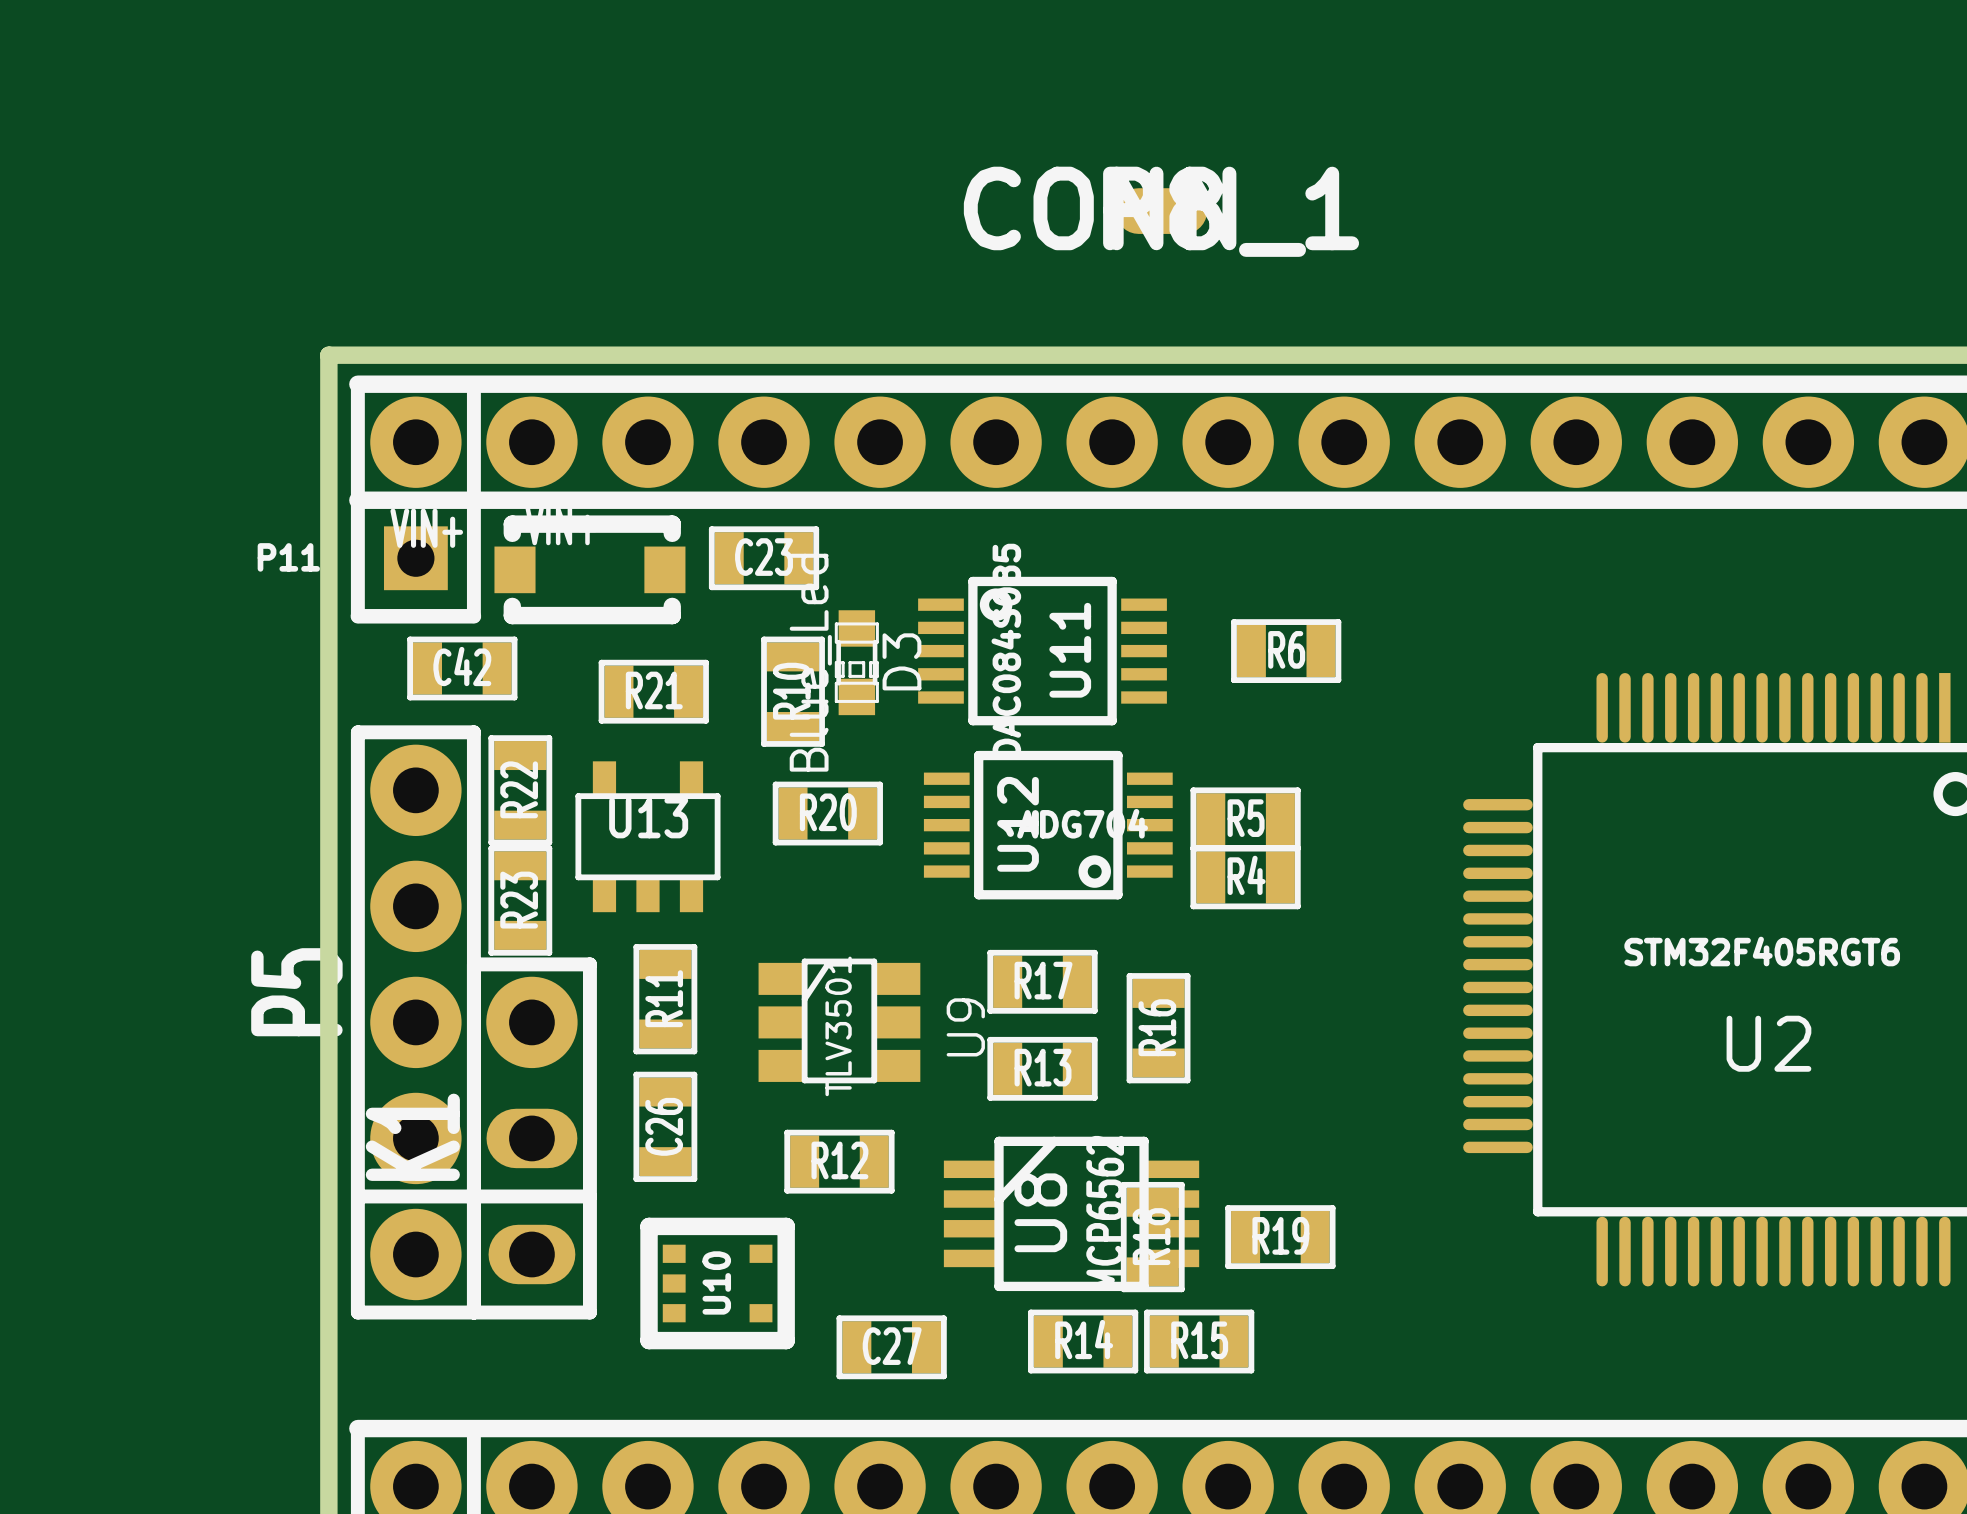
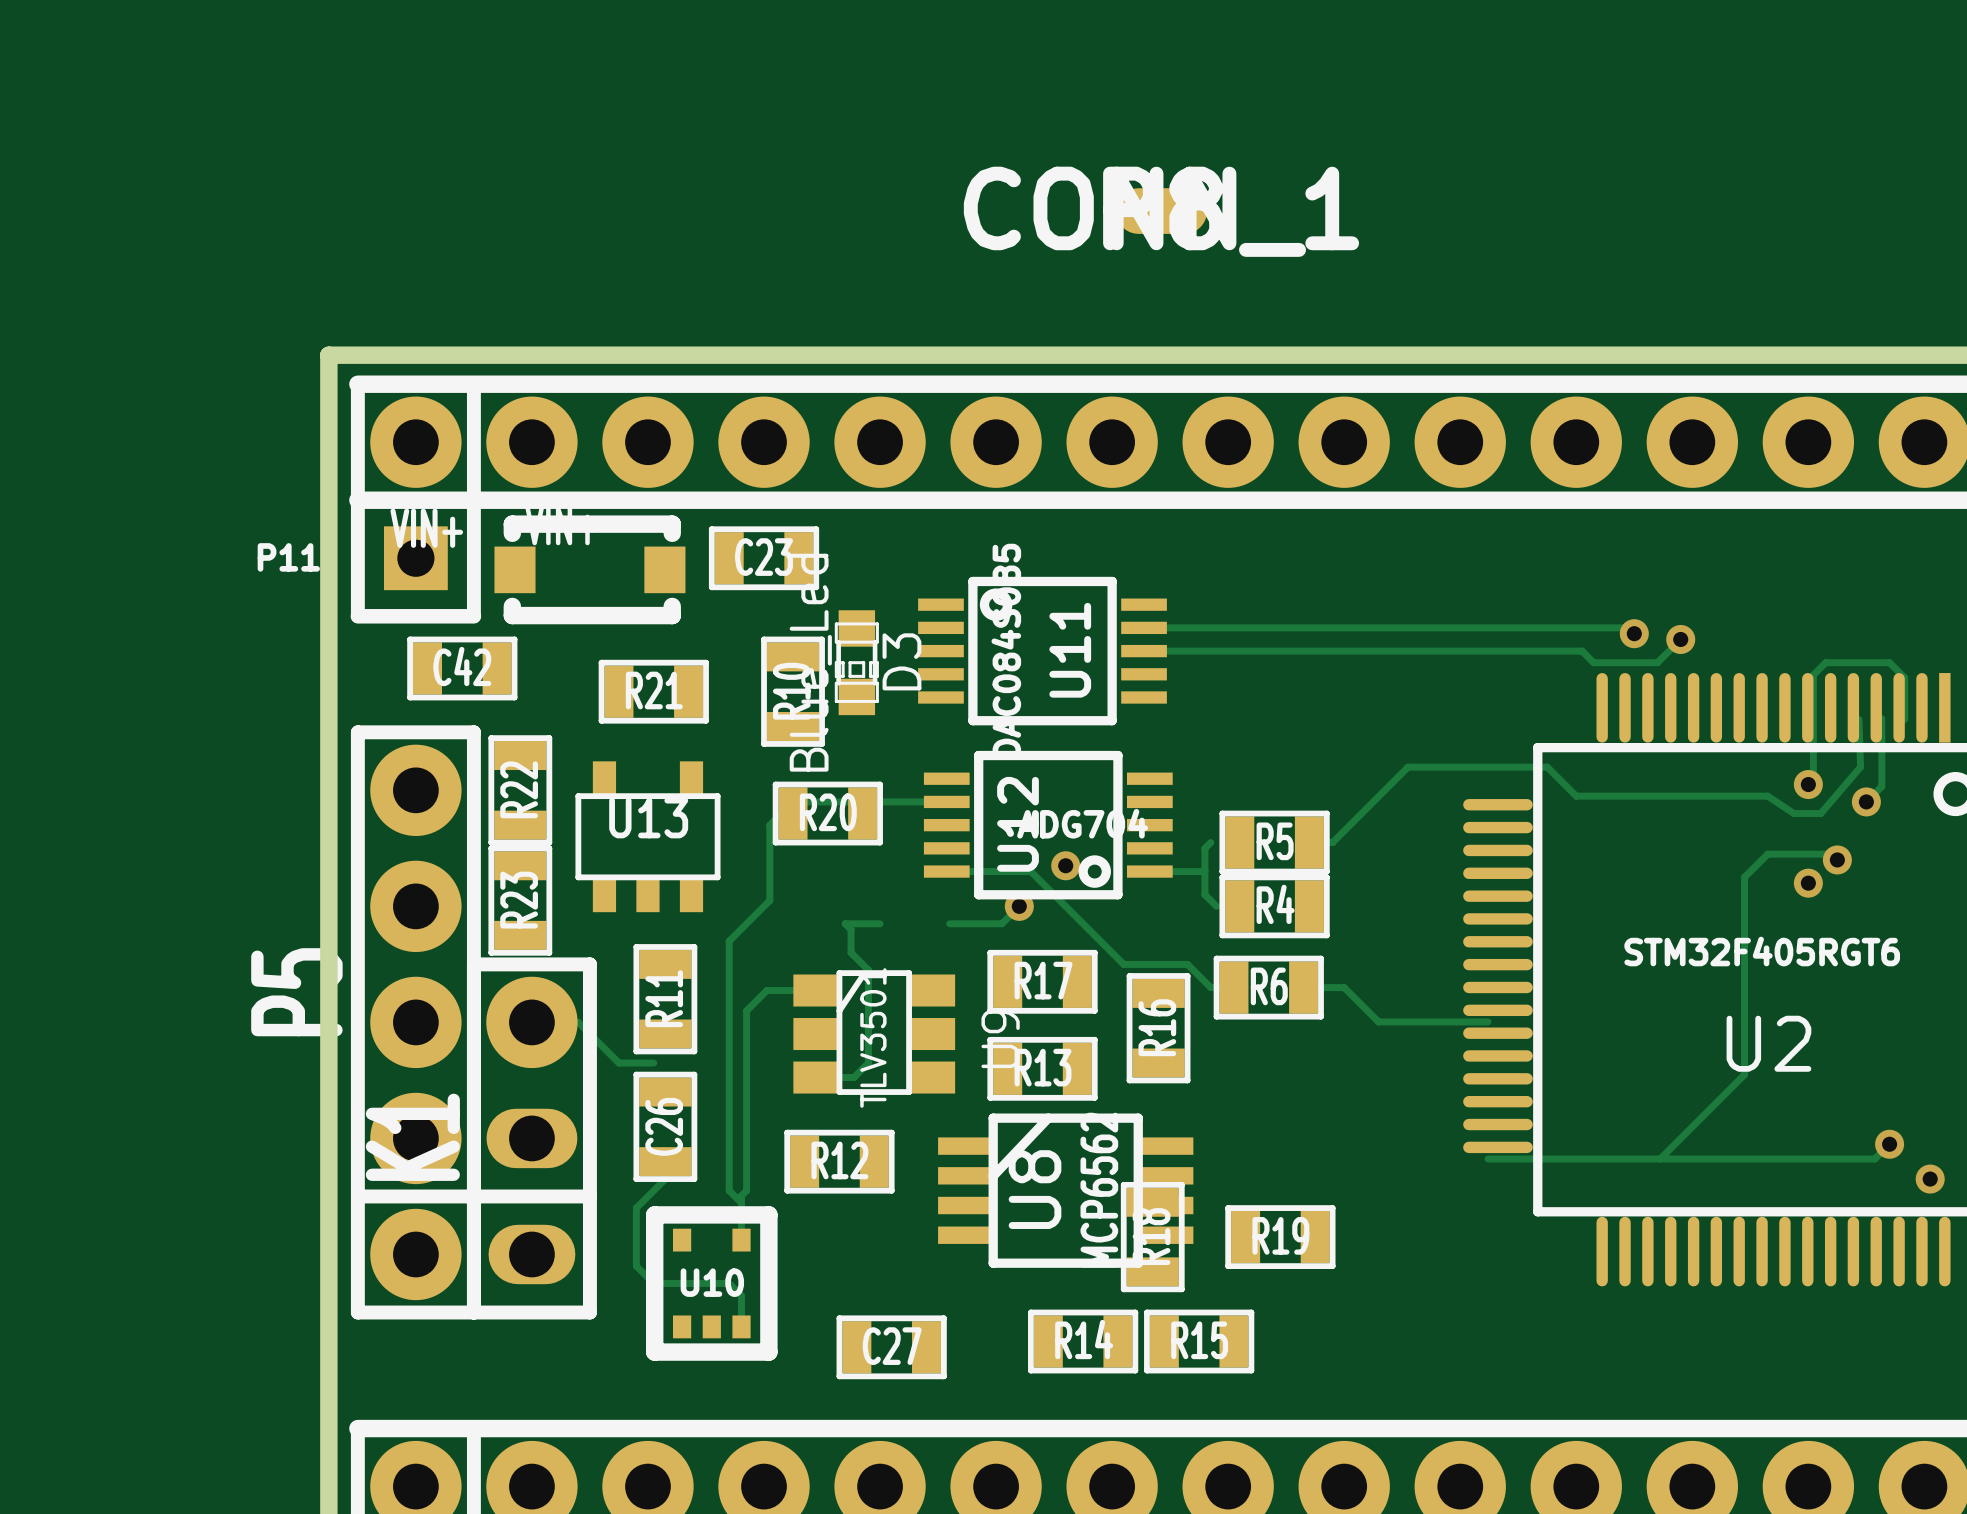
track: none -> (1144, 627) (1628, 627) (1634, 633)
via: none -> (1634, 633)
track: none -> (1680, 639) (1657, 662) (1593, 662) (1582, 651) (1144, 651)
via: none -> (1680, 639)
R6 position: (1286, 651) -> (1268, 987)
track: none -> (1881, 718) (1881, 786) (1866, 801)
track: none -> (1858, 719) (1860, 767) (1820, 813) (1793, 813) (1767, 796) (1576, 796) (1547, 767) (1408, 767) (1332, 842) (1309, 842)
track: none -> (1904, 719) (1904, 677) (1889, 662) (1825, 662) (1813, 675) (1813, 779) (1808, 784)
via: none -> (1808, 784)
track: none -> (946, 801) (793, 801) (769, 825) (769, 900) (729, 941) (729, 1190) (741, 1202)
via: none -> (1866, 801)
R5 position: (1245, 819) -> (1274, 842)
track: none -> (1210, 842) (1204, 848) (1204, 894) (1216, 906)
track: none -> (1837, 859) (1837, 854) (1767, 854) (1744, 877) (1744, 1074) (1660, 1158)
via: none -> (1837, 859)
via: none -> (1065, 865)
track: none -> (946, 871) (1030, 871) (1123, 964) (1187, 964) (1210, 987) (1233, 987)
track: none -> (1149, 871) (1204, 871)
R4 position: (1245, 877) -> (1274, 906)
via: none -> (1808, 883)
track: none -> (1019, 906) (1001, 923) (949, 923)
via: none -> (1019, 906)
track: none -> (880, 923) (845, 923) (851, 929) (851, 952) (868, 970) (868, 1063) (853, 1077) (816, 1077)
track: none -> (1303, 987) (1344, 987) (1378, 1021) (1487, 1021)
track: none -> (816, 990) (766, 990) (746, 1010) (746, 1190) (741, 1195) (741, 1240)
U9 position: (839, 1020) -> (874, 1032)
track: none -> (531, 1022) (578, 1022) (618, 1063) (653, 1063)
track: none -> (1889, 1144) (1874, 1158) (1487, 1158)
via: none -> (1889, 1144)
track: none -> (665, 1161) (665, 1179) (636, 1208) (636, 1266) (653, 1283) (729, 1283) (741, 1295) (741, 1326)
via: none -> (1930, 1179)
U8 position: (1071, 1213) -> (1065, 1190)
U10 rotation: 0° (717, 1283) -> 90° counterclockwise (711, 1283)

